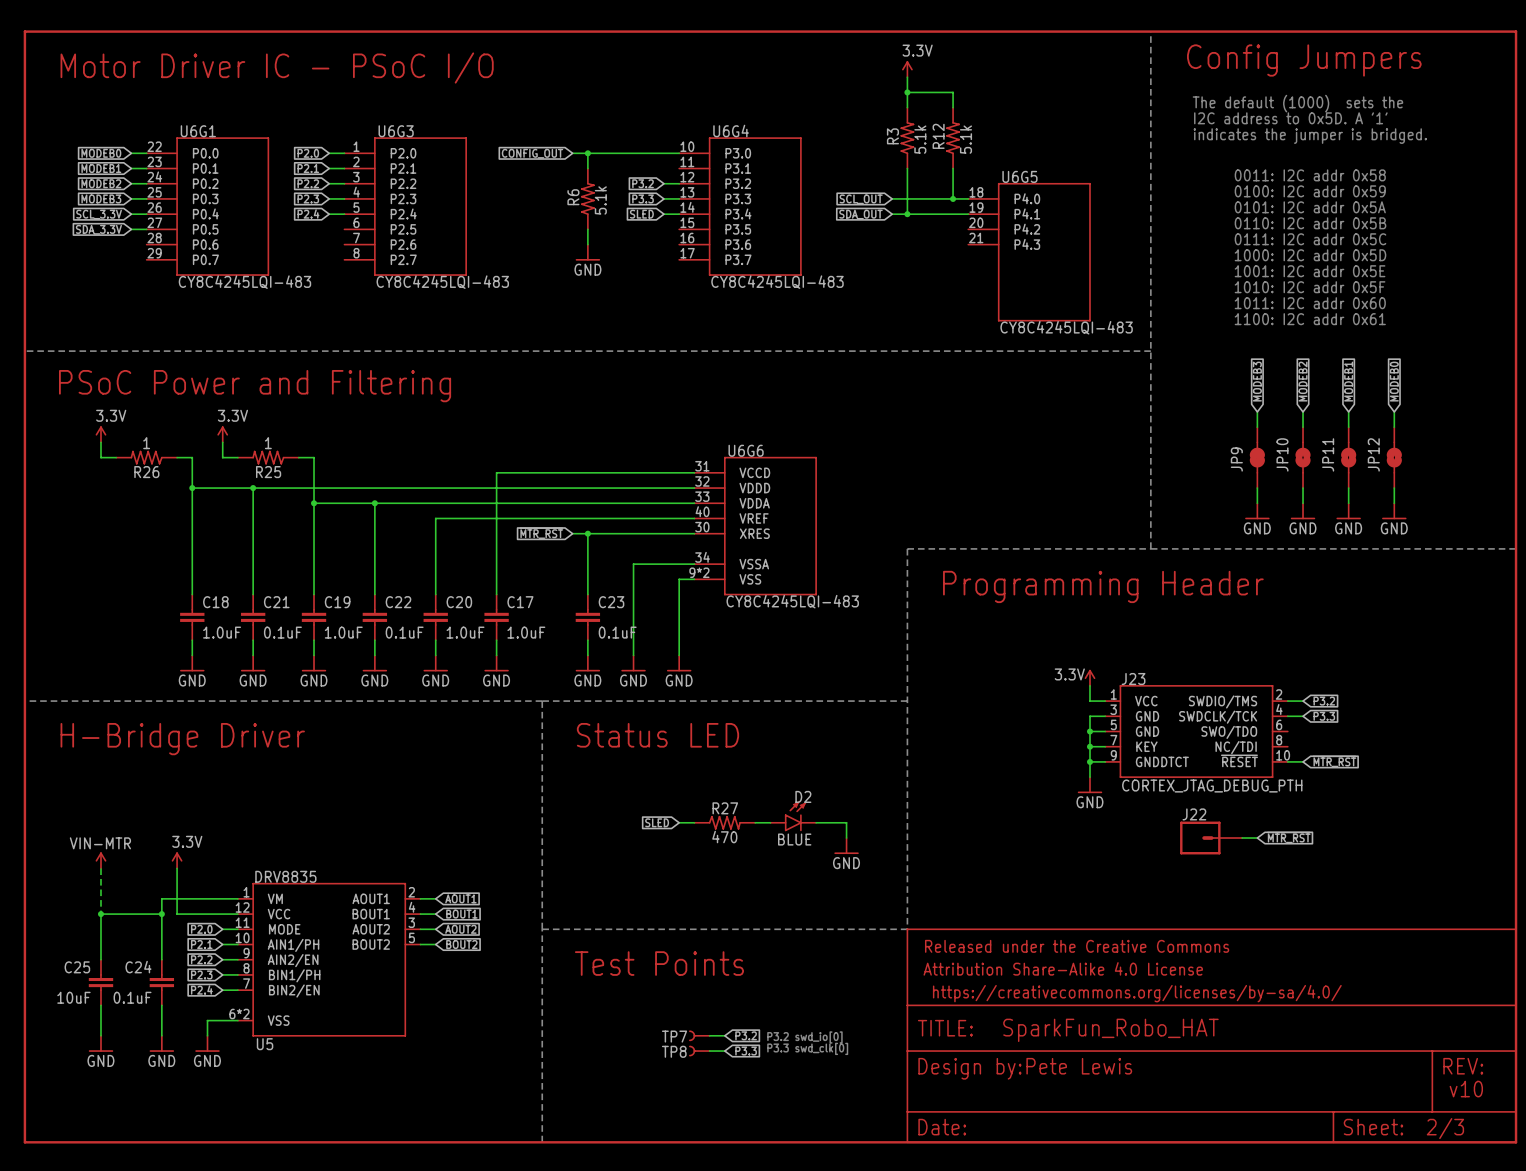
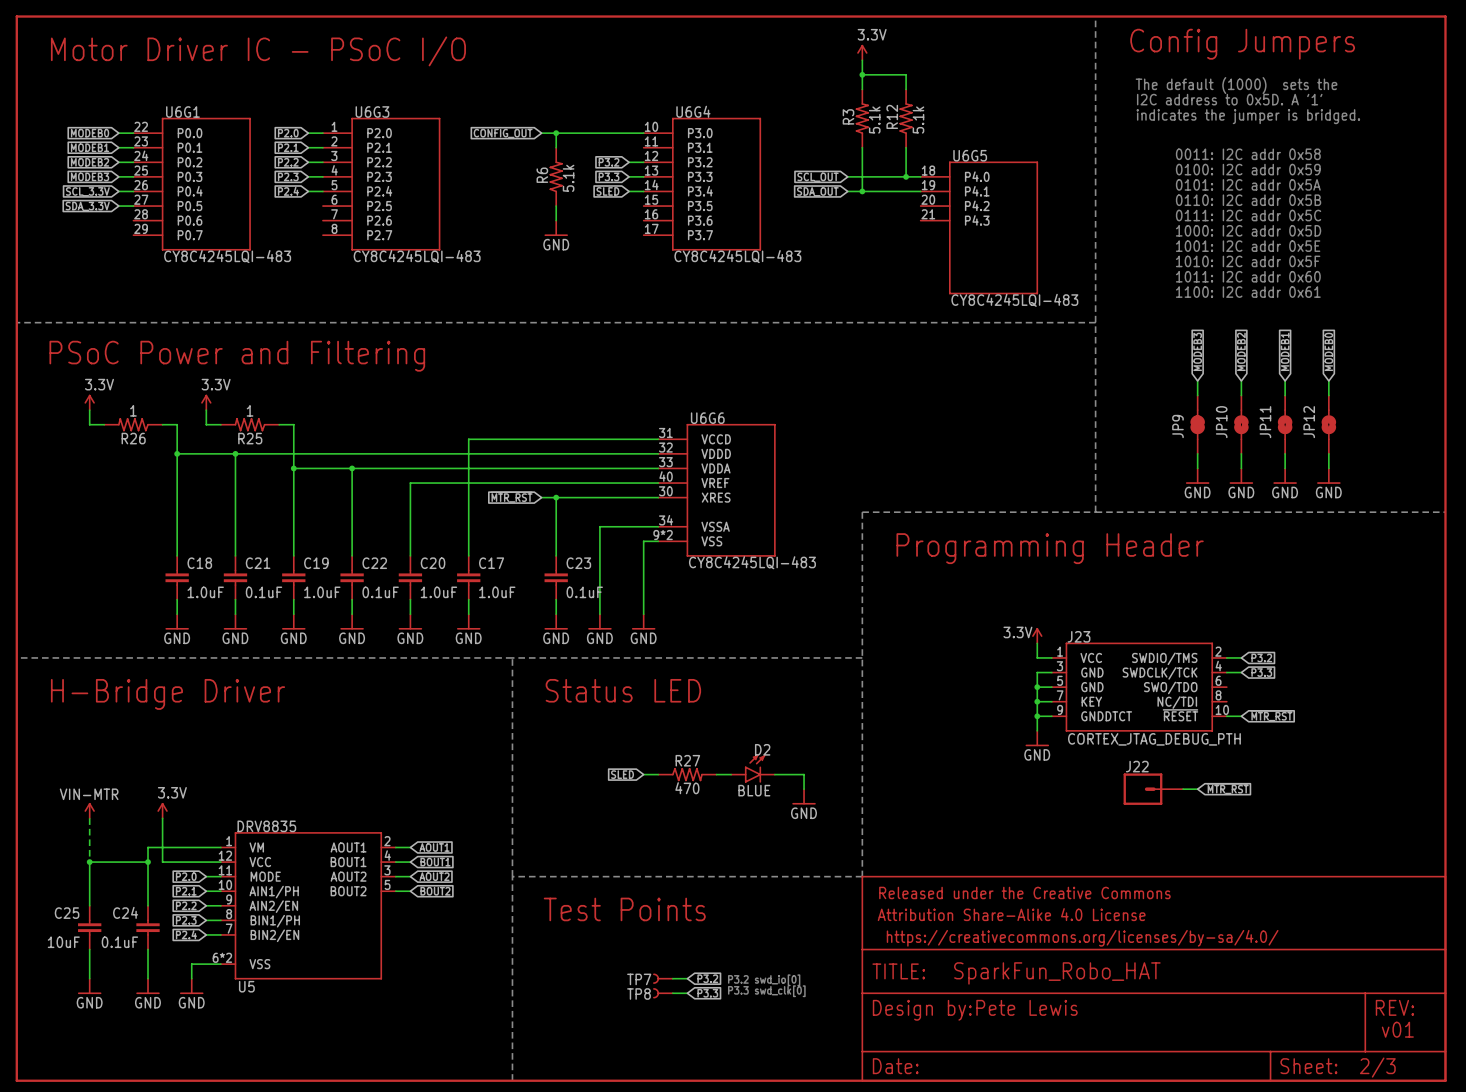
text: v10 (1466, 1089) -> v01 (1397, 1029)

